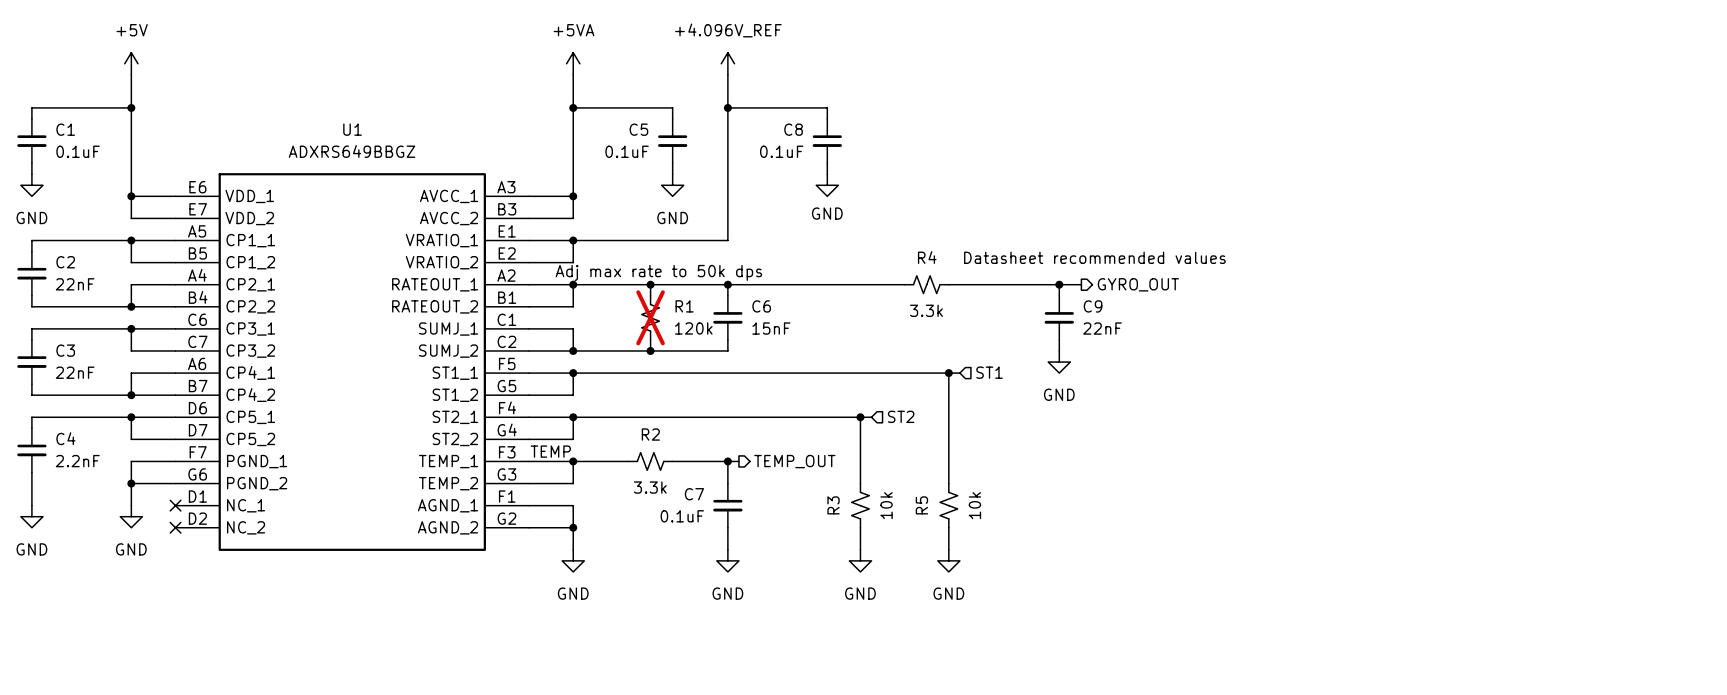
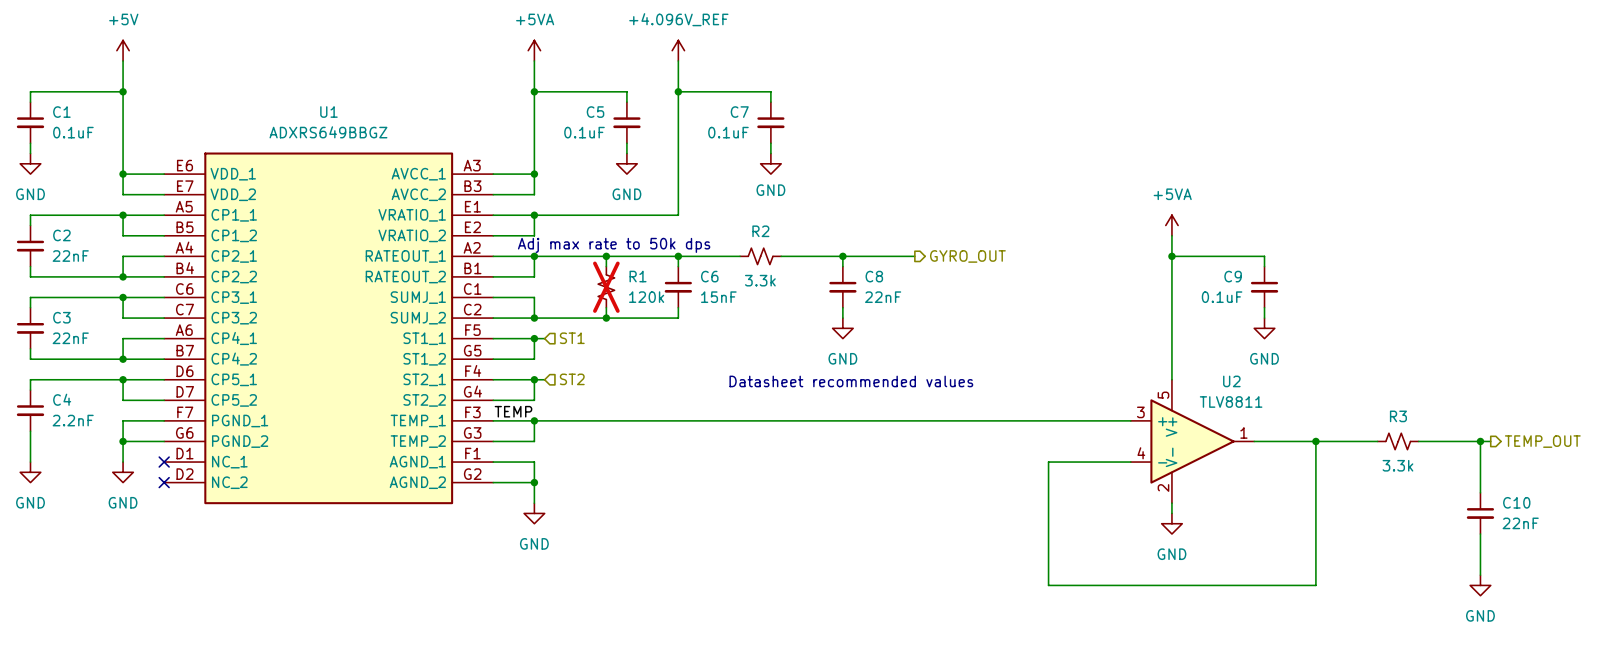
C8 name: C8 (793, 129) -> C7 (739, 112)
power symbol: none -> +5VA (1171, 225)
text: Datasheet recommended values (1094, 257) -> none
wire: none -> (1171, 235) (1171, 379)
junction: none -> (842, 256)
R4: 3.3k (926, 284) -> none
wire: none -> (884, 256) (842, 256) (842, 266)
wire: (981, 284) (1081, 284) -> none
wire: (1059, 284) (1059, 295) -> none
junction: (1059, 284) -> none
hierarchical label position: GYRO_OUT (1138, 284) -> GYRO_OUT (967, 256)
wire: none -> (1171, 256) (1264, 256) (1264, 266)
junction: none -> (1171, 256)
C9 name position: C9 (1093, 306) -> C9 (1233, 276)
C8: none -> 22nF (842, 287)
C9 position: (1059, 317) -> (1264, 287)
C9 value: 22nF (1102, 328) -> 0.1uF (1222, 297)
wire: (1059, 339) (1059, 350) -> (842, 307) (842, 318)
wire: none -> (1264, 307) (1264, 318)
power symbol: none -> GND (842, 328)
power symbol: GND (1059, 362) -> none
power symbol: none -> GND (1264, 328)
hierarchical label: none -> ST1 (572, 338)
hierarchical label: ST1 (989, 372) -> none
wire: (584, 373) (959, 373) -> none
wire: (948, 373) (948, 483) -> none
junction: (948, 373) -> none
hierarchical label: none -> ST2 (572, 379)
hierarchical label: ST2 (901, 416) -> none
wire: (584, 417) (871, 417) -> none
wire: (860, 417) (860, 483) -> none
junction: (860, 417) -> none
text: none -> Datasheet recommended values (851, 381)
R2 position: (650, 461) -> (760, 256)
wire: (727, 461) (727, 483) -> none
junction: (727, 461) -> none
wire: none -> (688, 420) (1130, 420)
hierarchical label: TEMP_OUT (794, 461) -> none
U2: none -> TLV8811 (1192, 441)
wire: none -> (1254, 441) (1377, 441)
wire: none -> (1315, 441) (1315, 585) (1048, 585) (1048, 462) (1130, 462)
junction: none -> (1315, 441)
wire: none -> (1418, 441) (1490, 441)
wire: none -> (1480, 441) (1480, 492)
junction: none -> (1480, 441)
hierarchical label: none -> TEMP_OUT (1542, 441)
C7: 0.1uF (727, 505) -> none
R3 rotation: 0° (860, 505) -> 90° clockwise (1398, 441)
R3 position: (860, 505) -> (1398, 441)
R3 value: 10k (886, 505) -> 3.3k (1397, 465)
R5: 10k (948, 505) -> none
wire: (727, 527) (727, 549) -> none
wire: (860, 527) (860, 549) -> none
wire: (948, 527) (948, 549) -> none
wire: none -> (1171, 503) (1171, 513)
power symbol: GND (727, 560) -> none
power symbol: GND (860, 560) -> none
power symbol: GND (948, 560) -> none
C10: none -> 22nF (1480, 513)
power symbol: none -> GND (1171, 523)
wire: none -> (1480, 534) (1480, 575)
power symbol: none -> GND (1480, 585)

